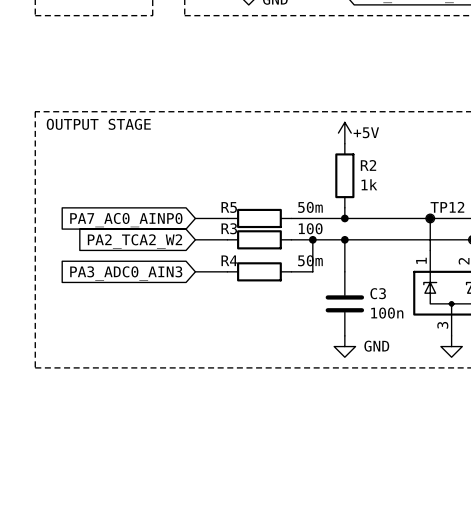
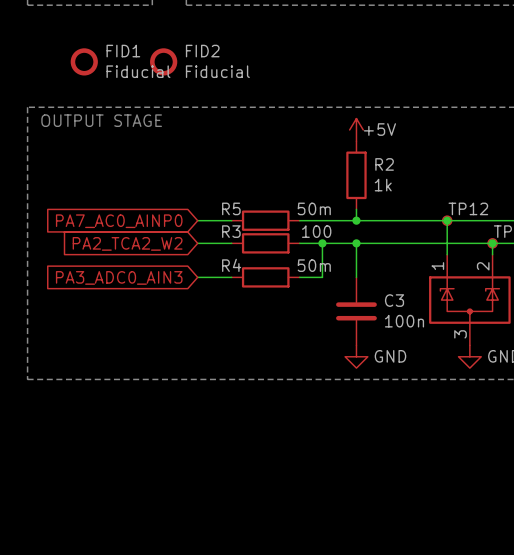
FID1: none -> Fiducial (84, 61)
FID2: none -> Fiducial (163, 61)

